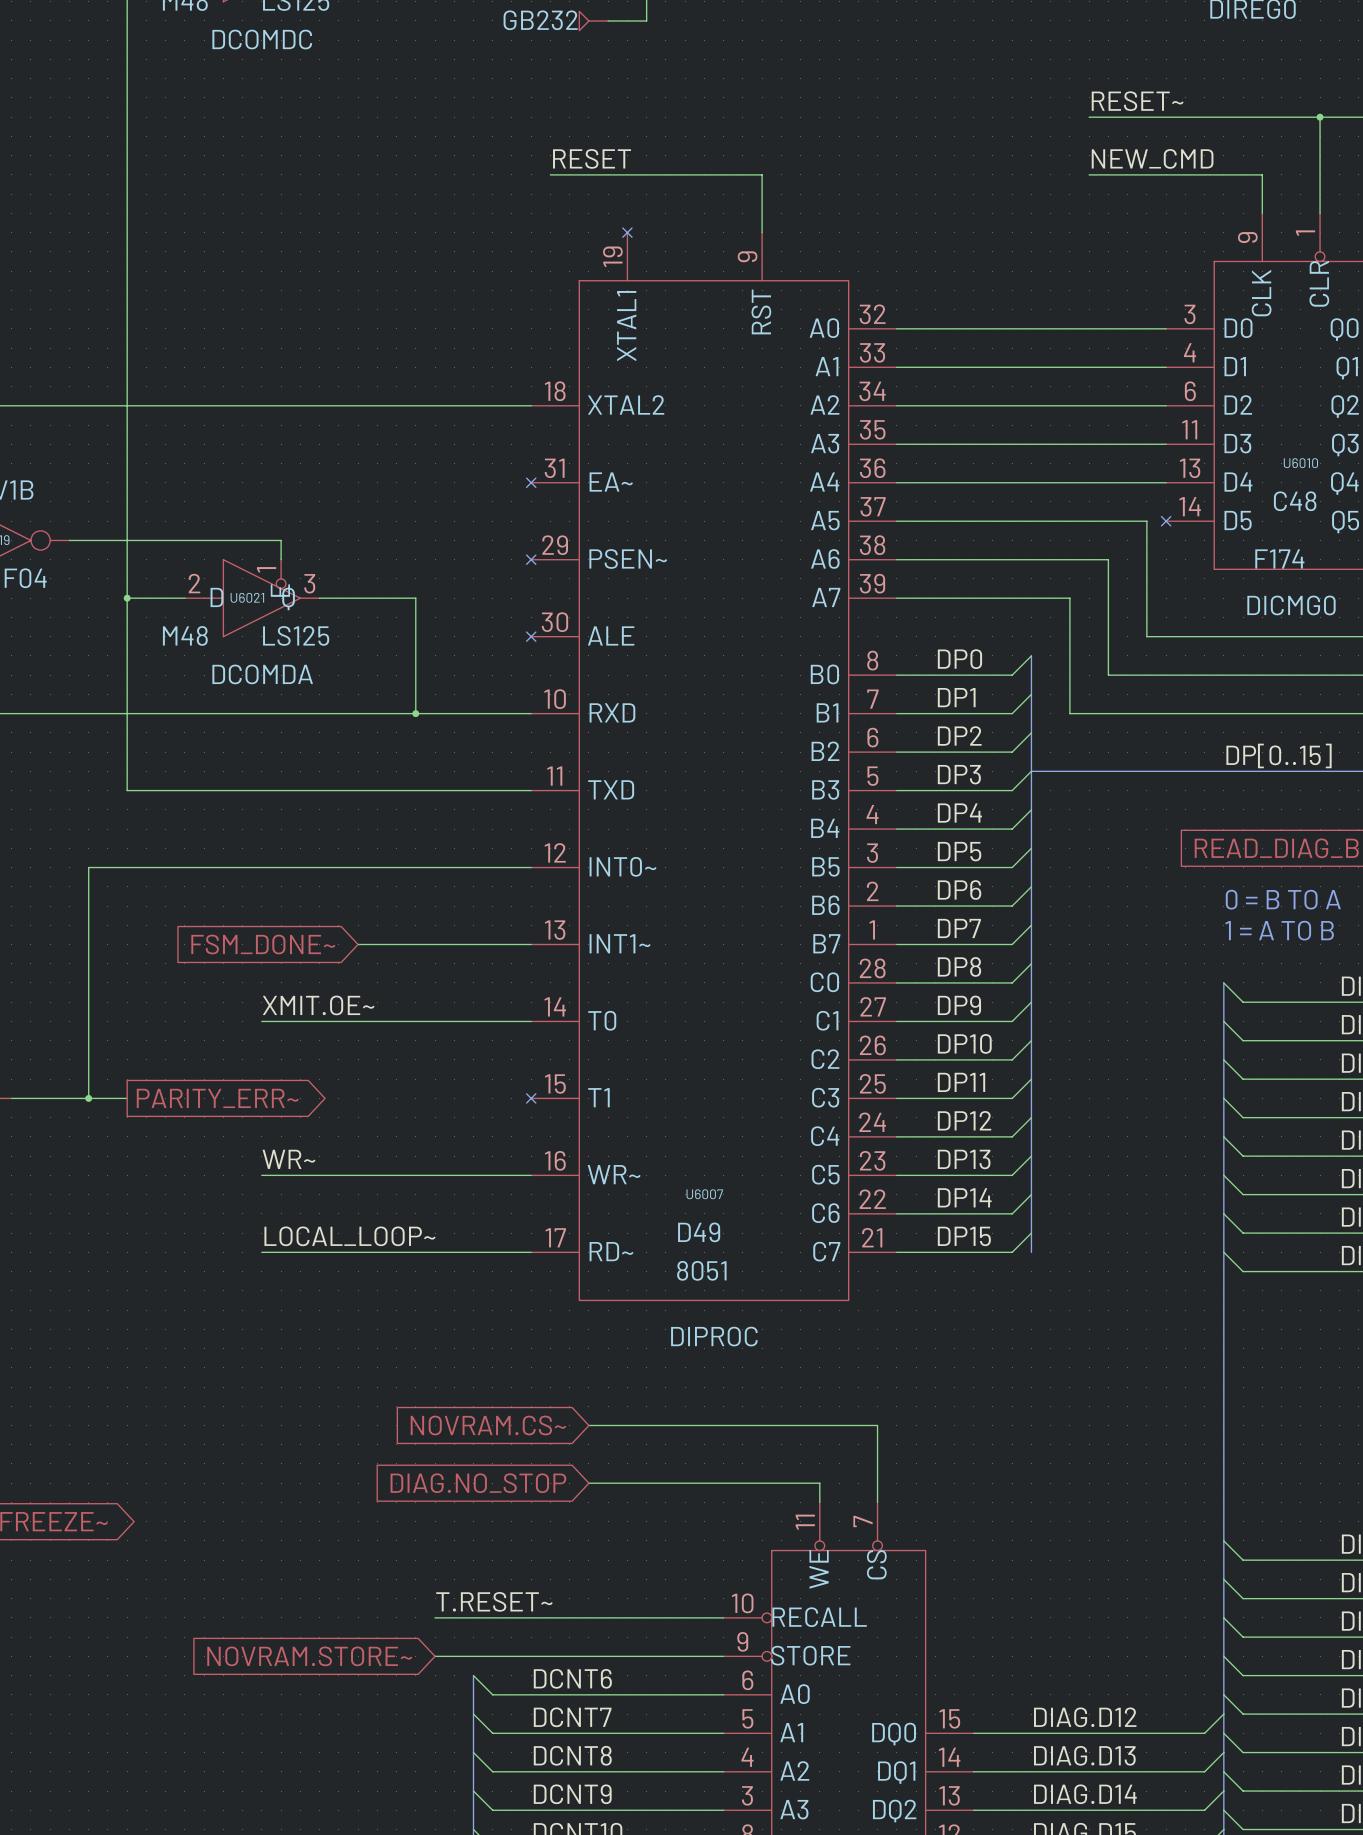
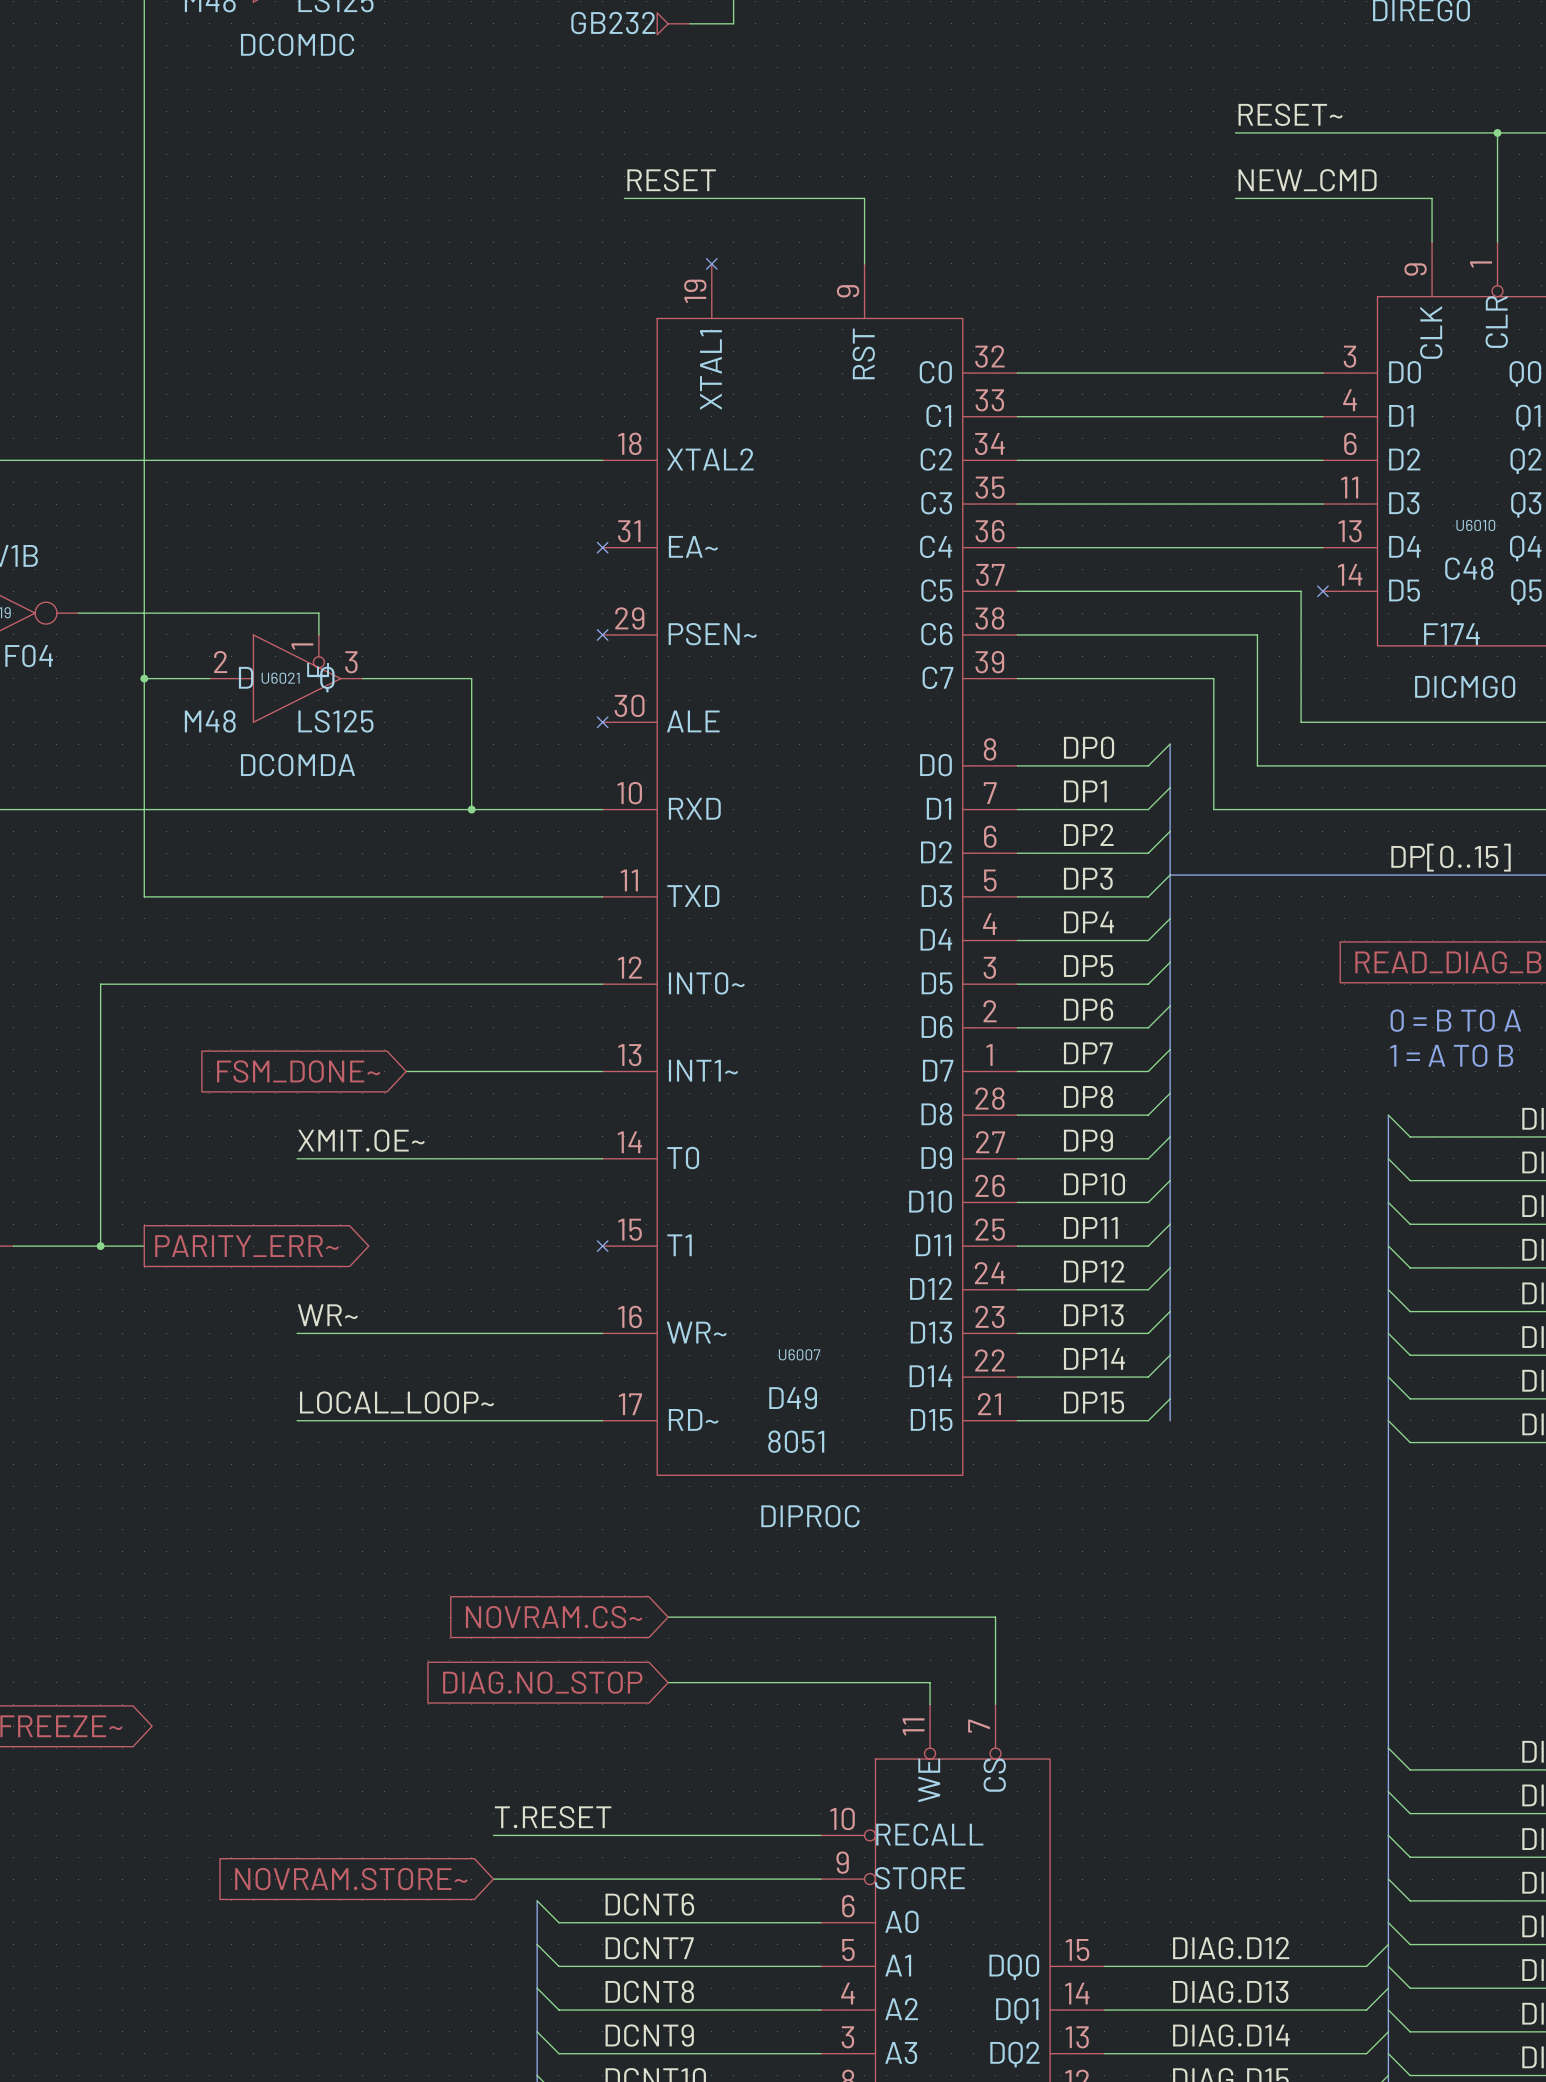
U6007 symbol: [531, 232, 897, 1301] -> [602, 263, 1018, 1476]
label: T.RESET~ (494, 1601) -> T.RESET (553, 1817)

